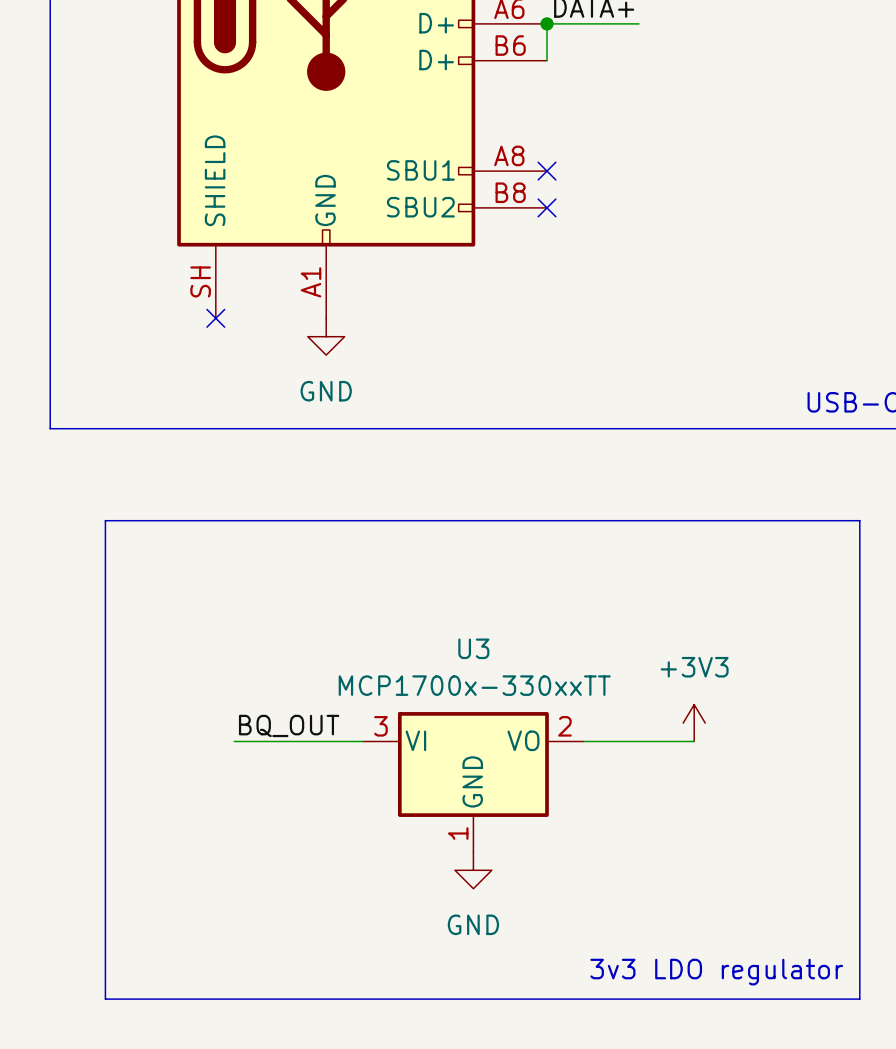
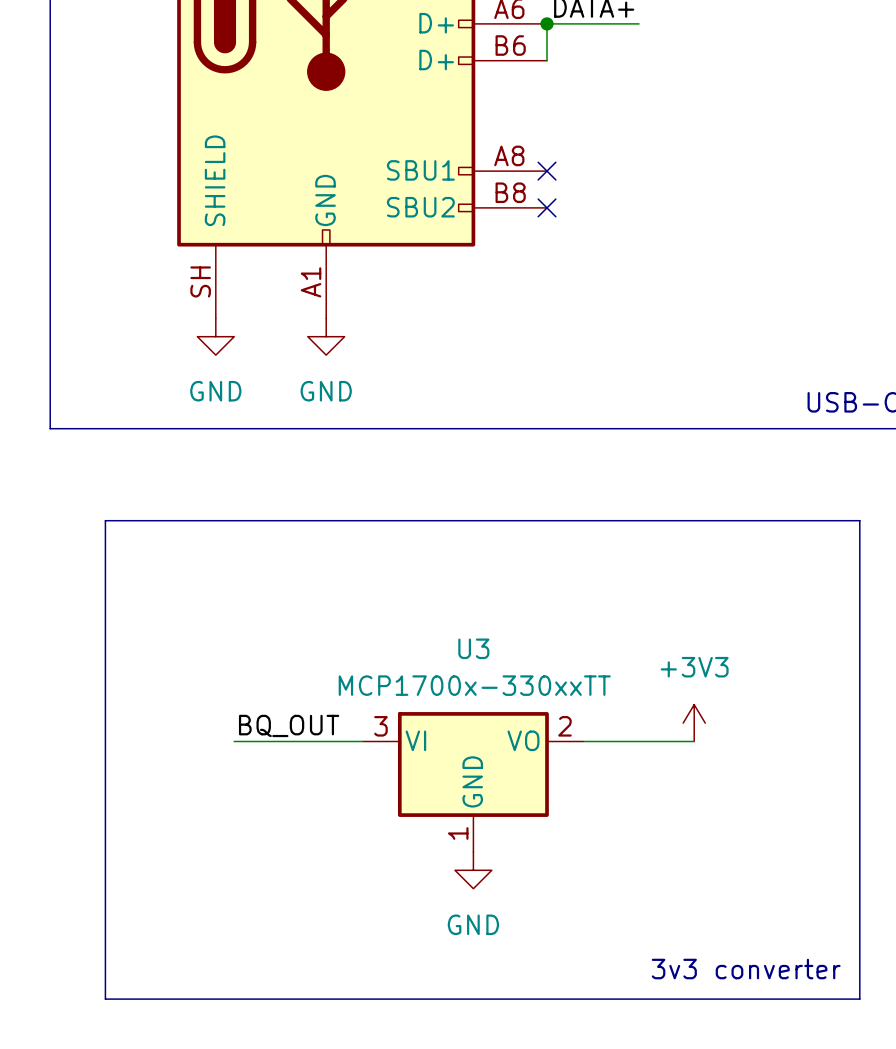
no-connect mark: (215, 318) -> none
power symbol: none -> GND (215, 336)
text: none -> 3v3 converter (746, 969)
text: 3v3 LDO regulator (716, 972) -> none

